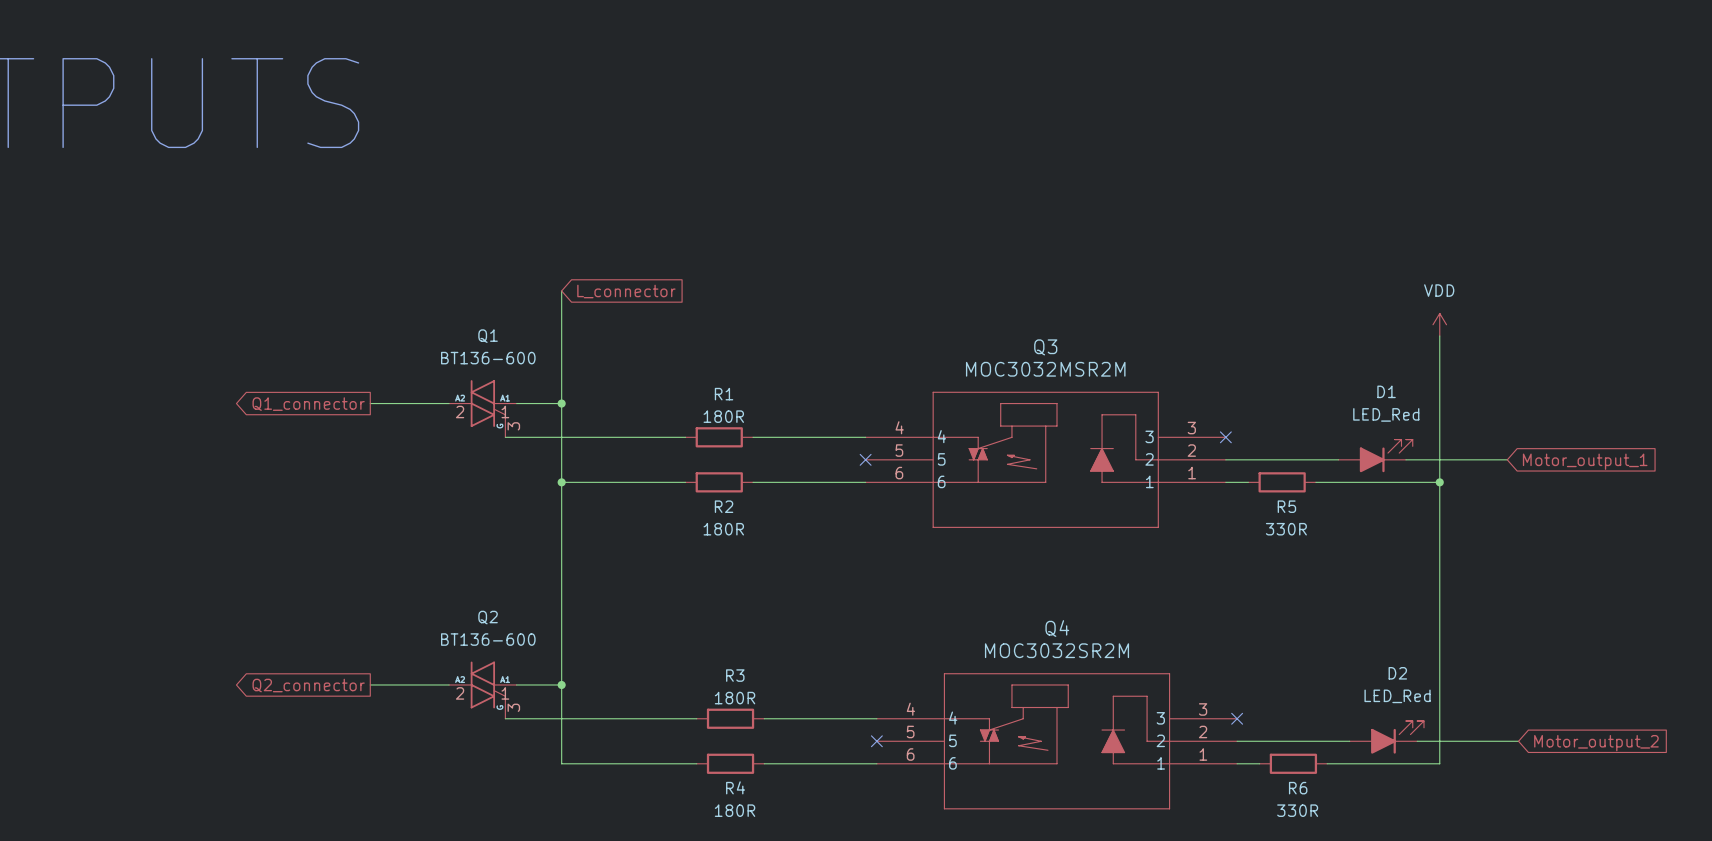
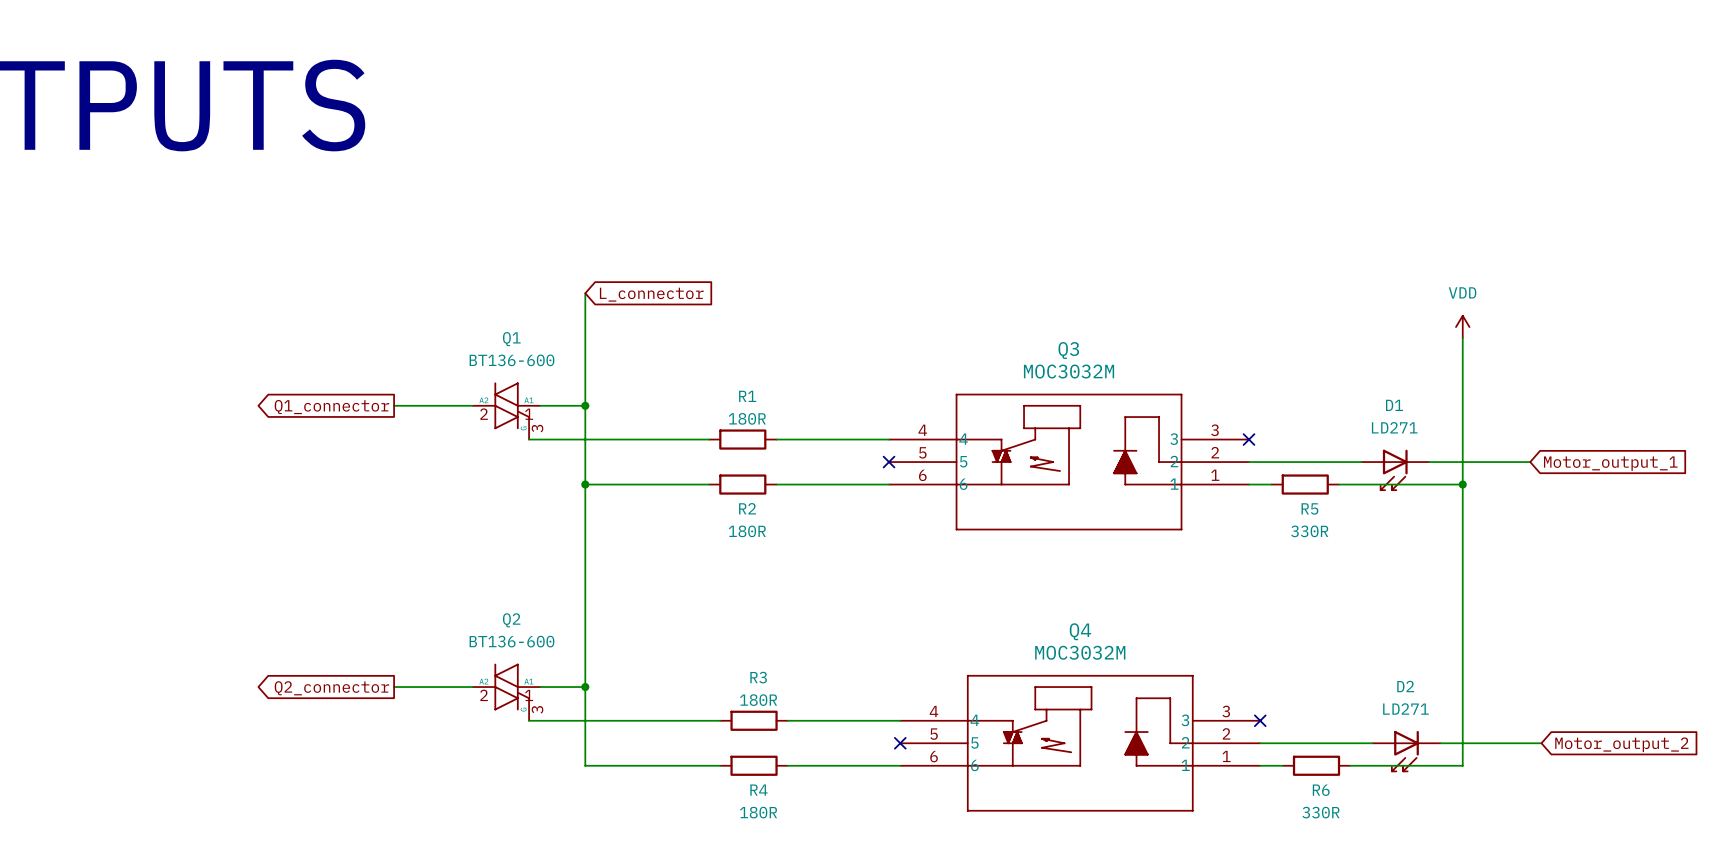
Q3 value: MOC3032MSR2M (1045, 369) -> MOC3032M (1069, 371)
D1 value: LED_Red (1386, 414) -> LD271 (1394, 427)
D1 symbol: [1338, 439, 1413, 473] -> [1361, 449, 1430, 491]
Q4 value: MOC3032SR2M (1057, 650) -> MOC3032M (1080, 652)
D2 value: LED_Red (1397, 696) -> LD271 (1405, 709)
D2 symbol: [1349, 721, 1424, 754] -> [1372, 730, 1441, 772]

